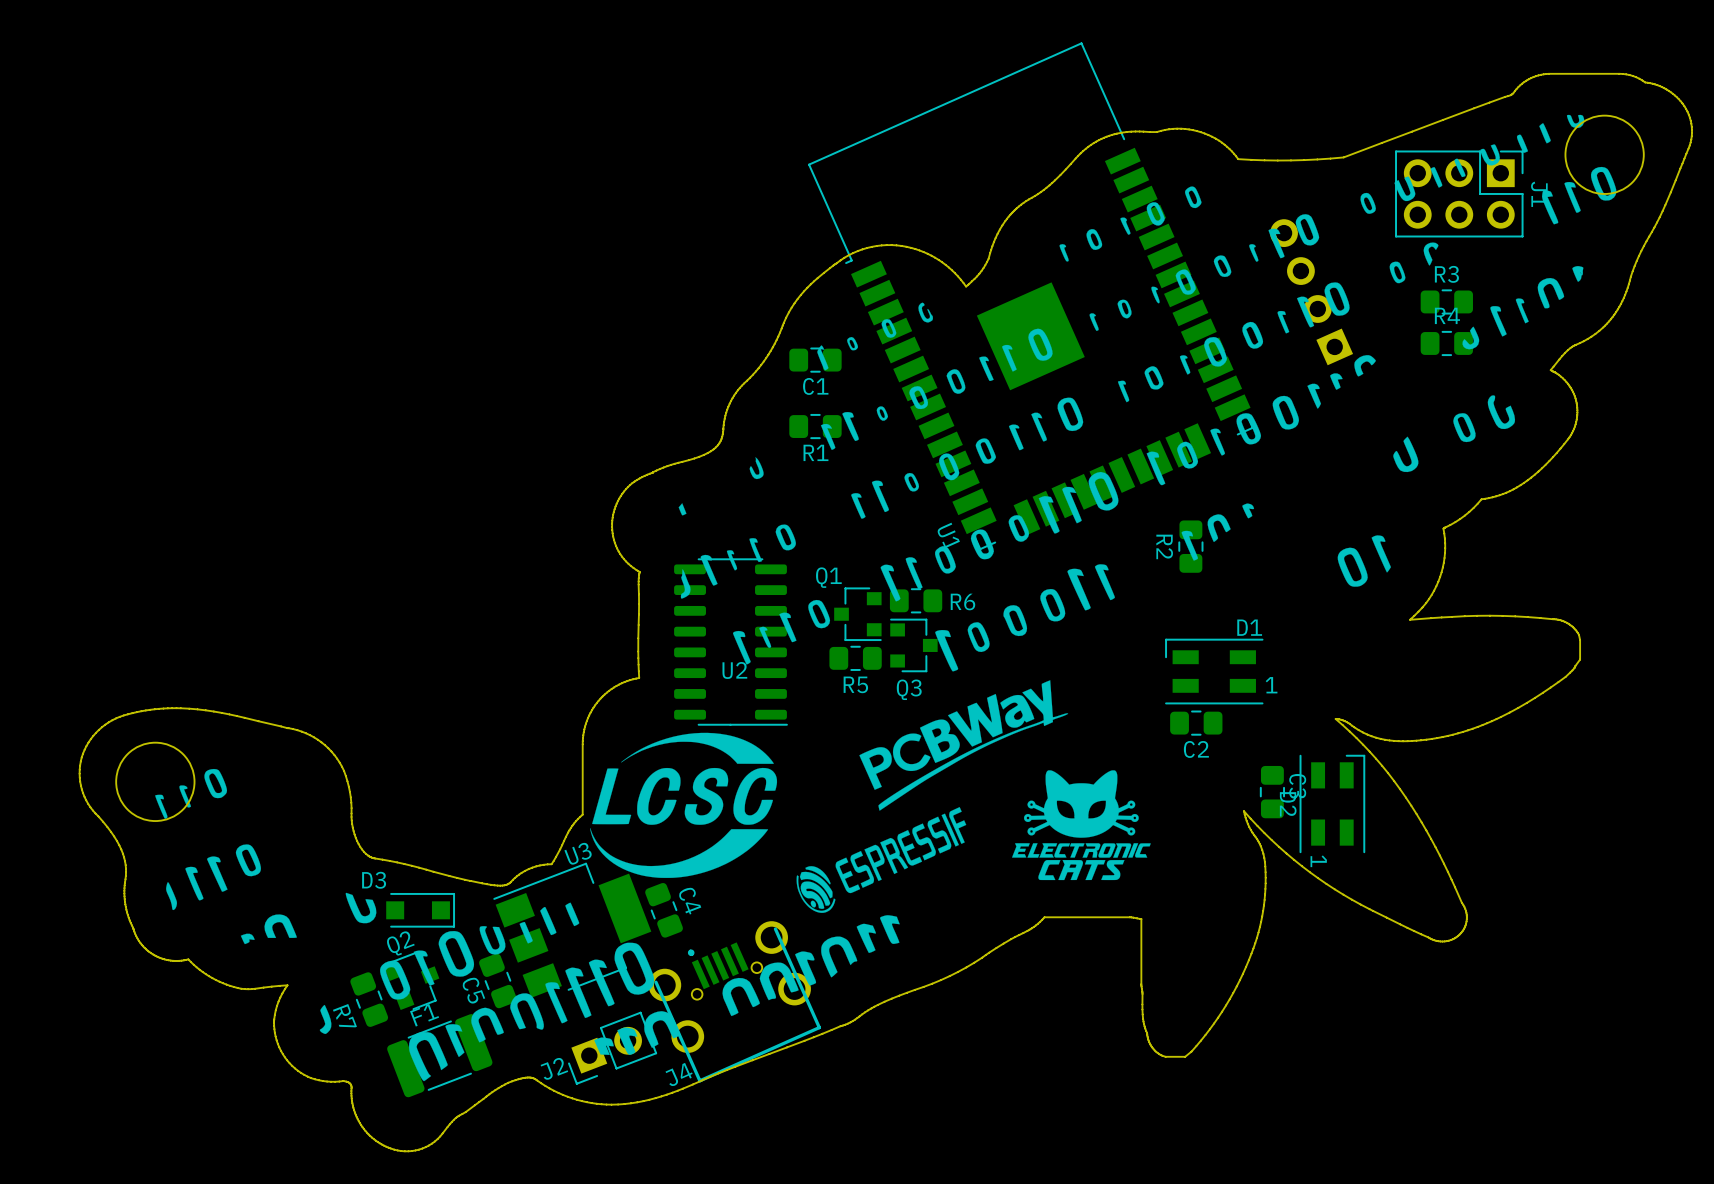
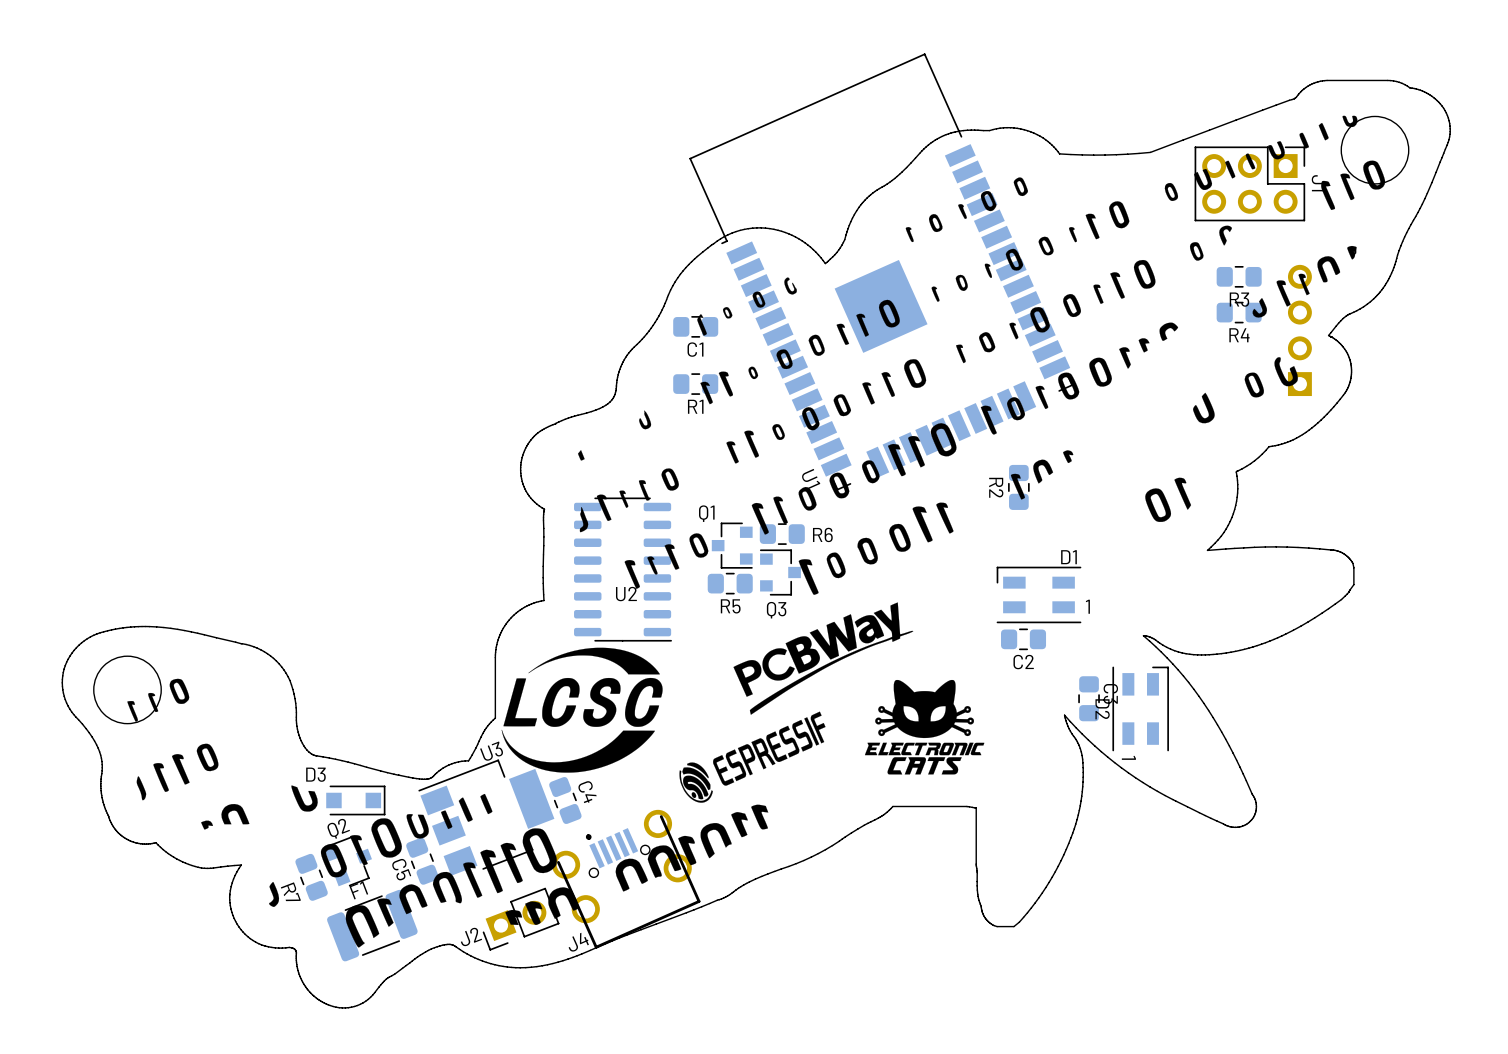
R3 name position: R3 (1446, 274) -> R3 (1239, 299)
part: (1311, 292) -> none
R4 name position: R4 (1447, 315) -> R4 (1239, 335)
part: none -> (1299, 330)

